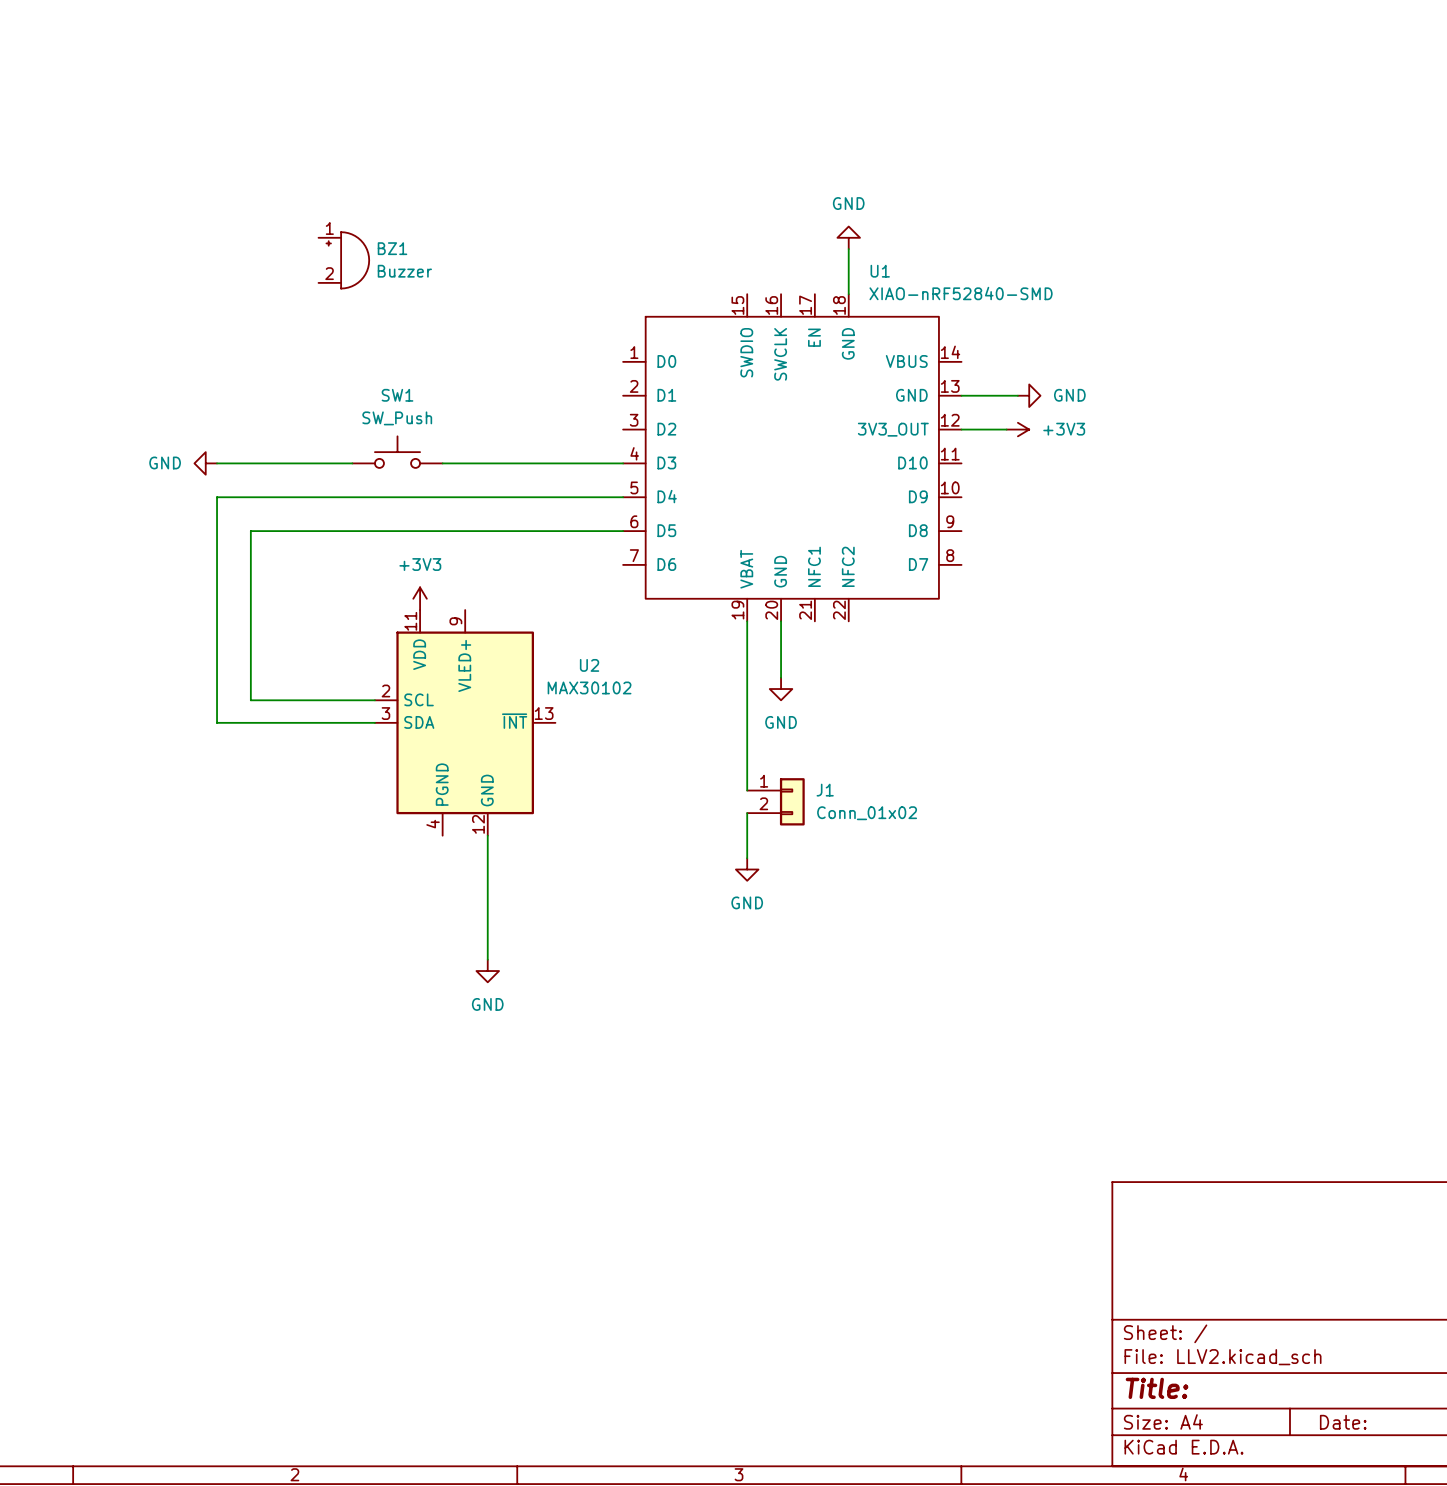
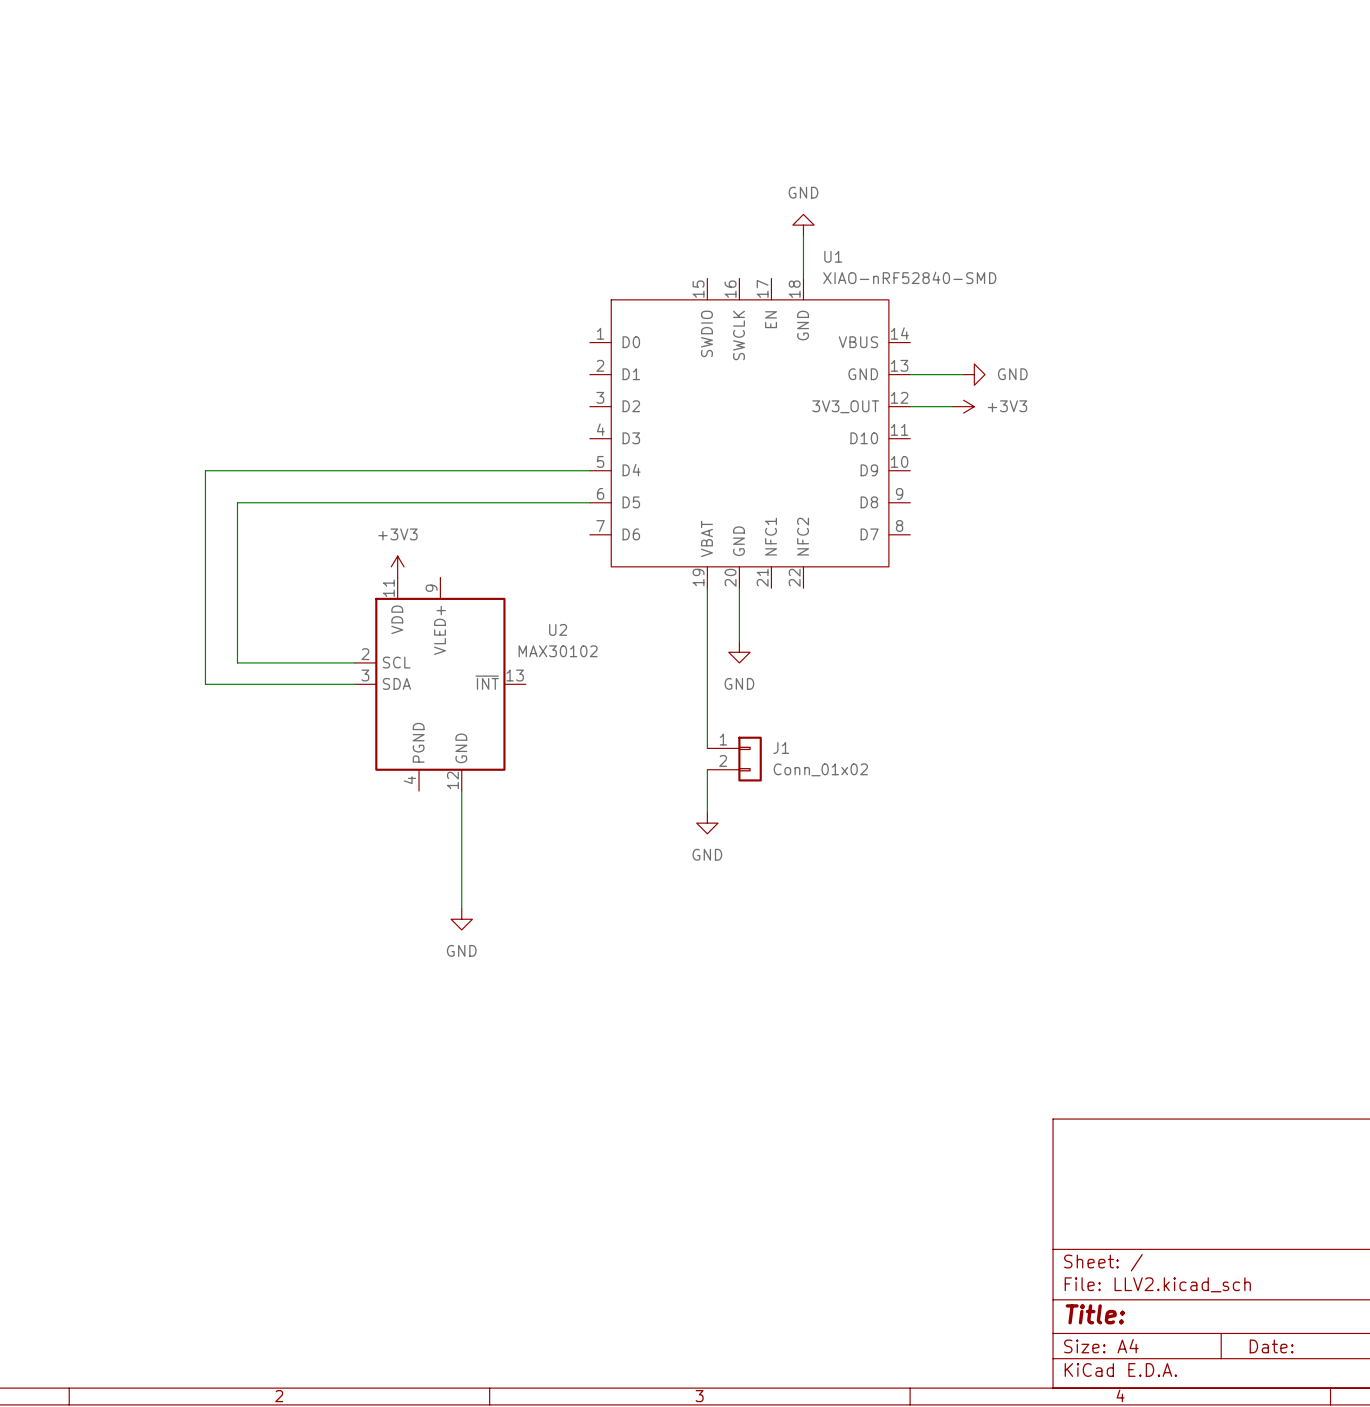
BZ1: Buzzer (343, 260) -> none
SW1: SW_Push (397, 452) -> none
power symbol: GND (205, 463) -> none
wire: (217, 463) (352, 463) -> none
wire: (442, 463) (623, 463) -> none

